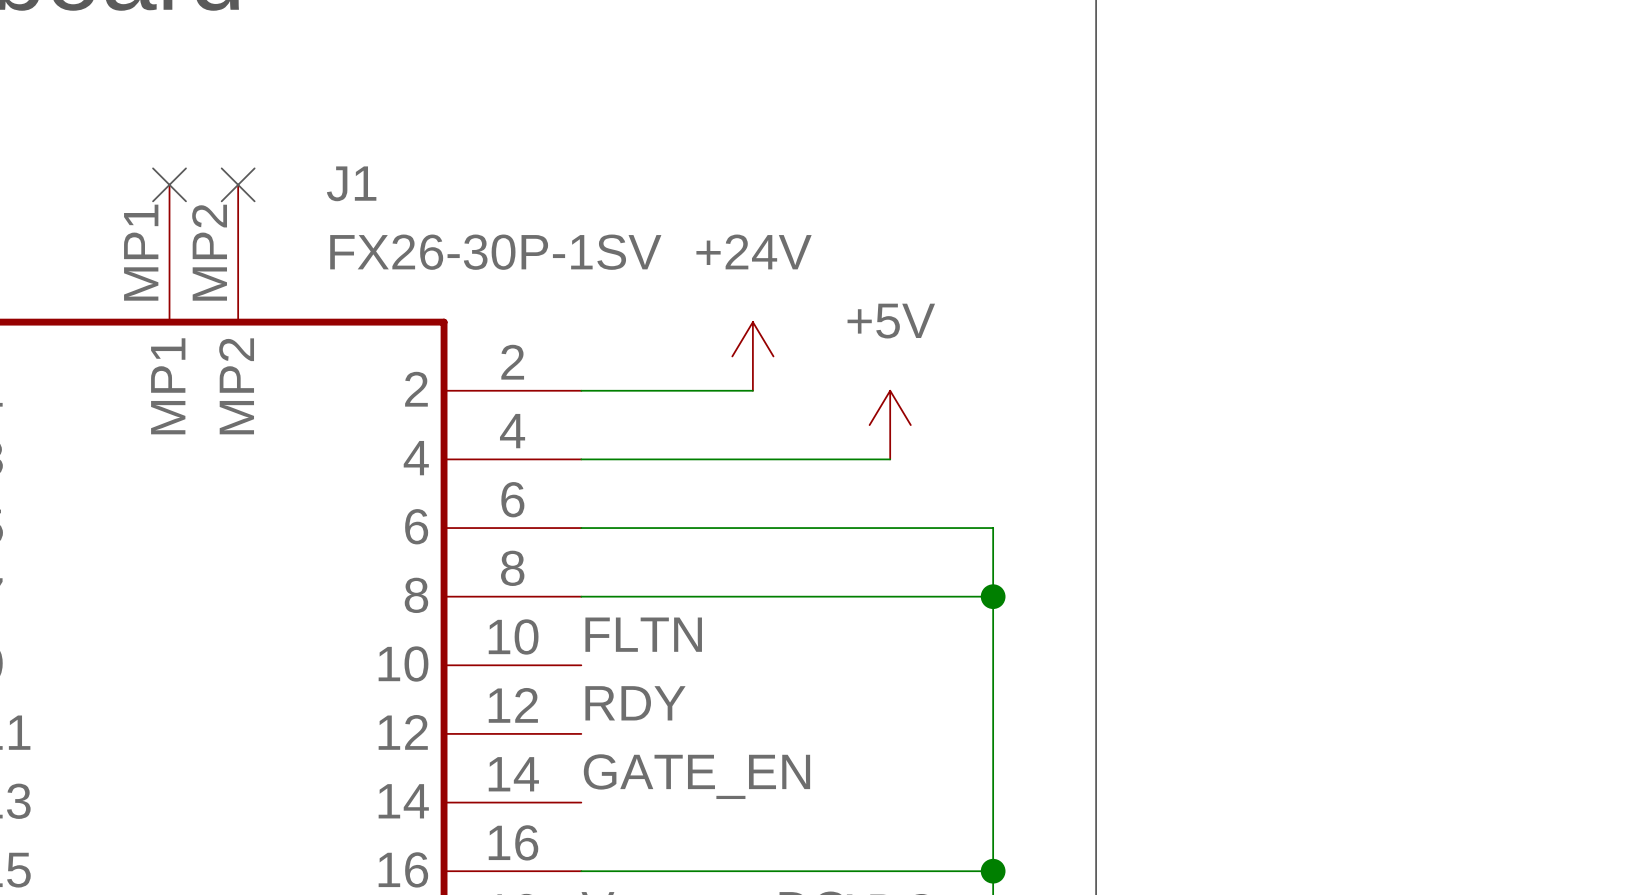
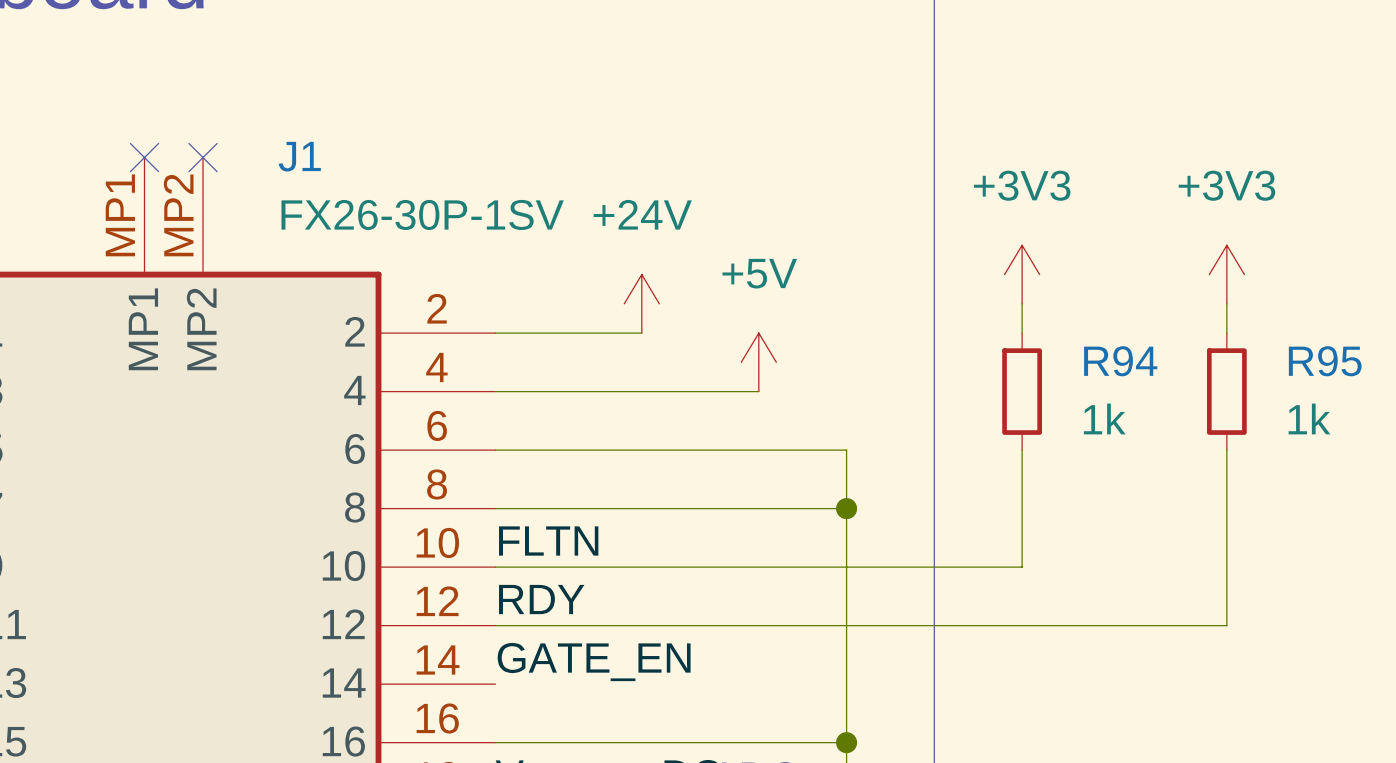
power symbol: none -> +3V3 (1022, 274)
power symbol: none -> +3V3 (1226, 274)
wire: none -> (1022, 303) (1022, 333)
wire: none -> (1226, 303) (1226, 333)
R94: none -> 1k (1022, 391)
R95: none -> 1k (1226, 391)
wire: none -> (1022, 450) (1022, 567) (495, 567)
wire: none -> (1226, 450) (1226, 625) (495, 625)

